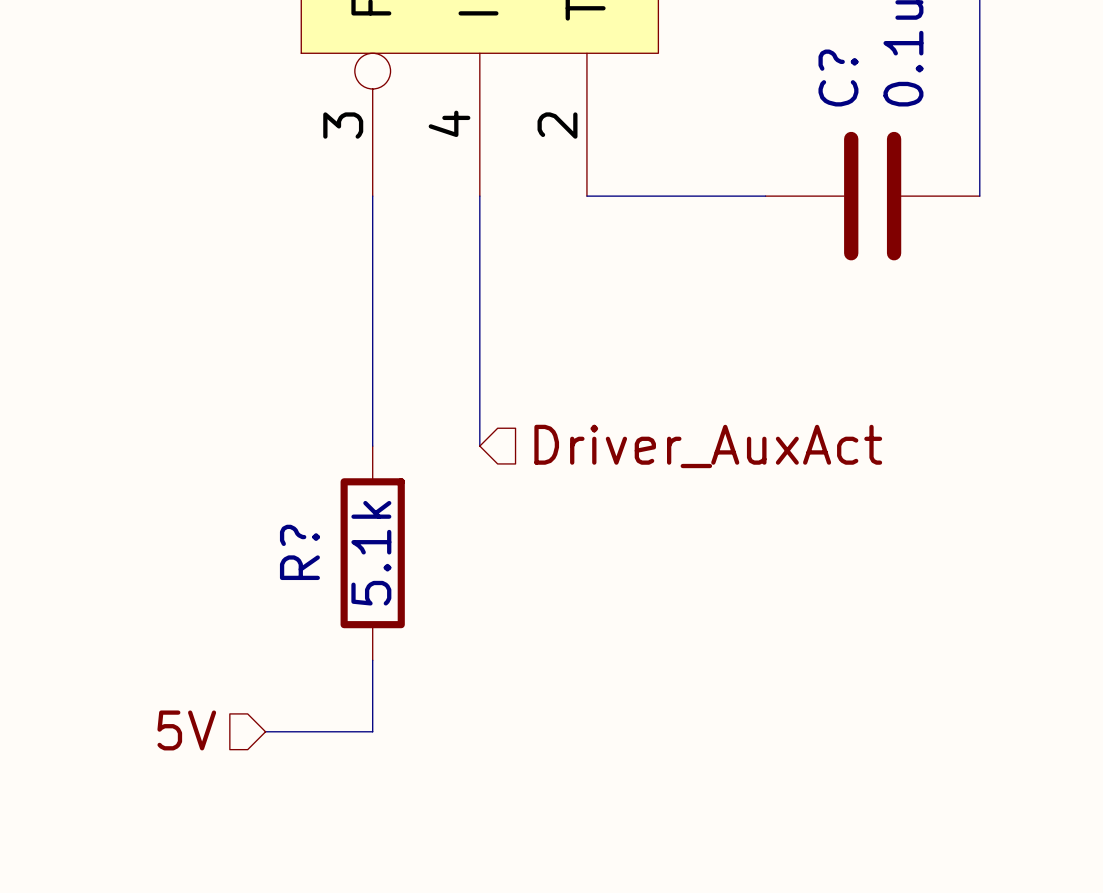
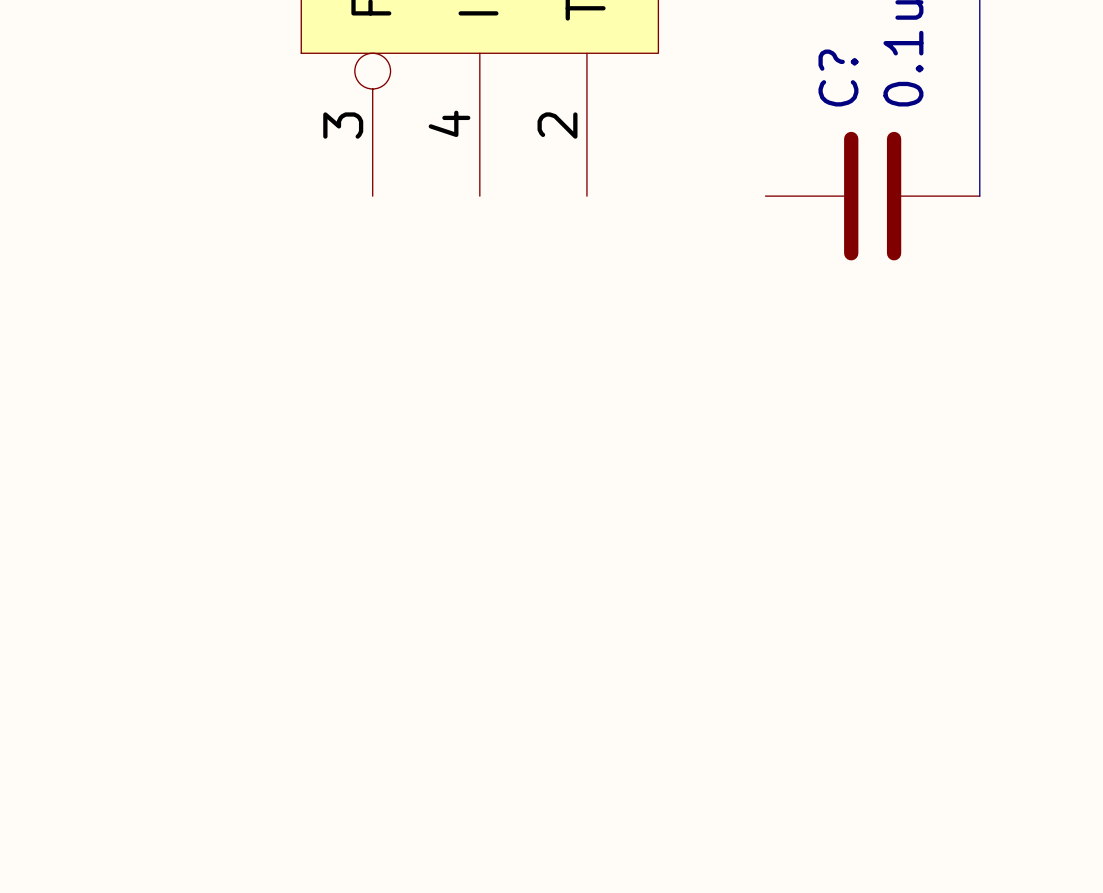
wire: (372, 196) (372, 446) -> none
wire: (479, 196) (479, 446) -> none
wire: (586, 196) (765, 196) -> none
hierarchical label: Driver_AuxAct (708, 446) -> none
R?: 5.1k (372, 553) -> none
wire: (372, 660) (372, 731) (265, 731) -> none
hierarchical label: 5V (186, 730) -> none

